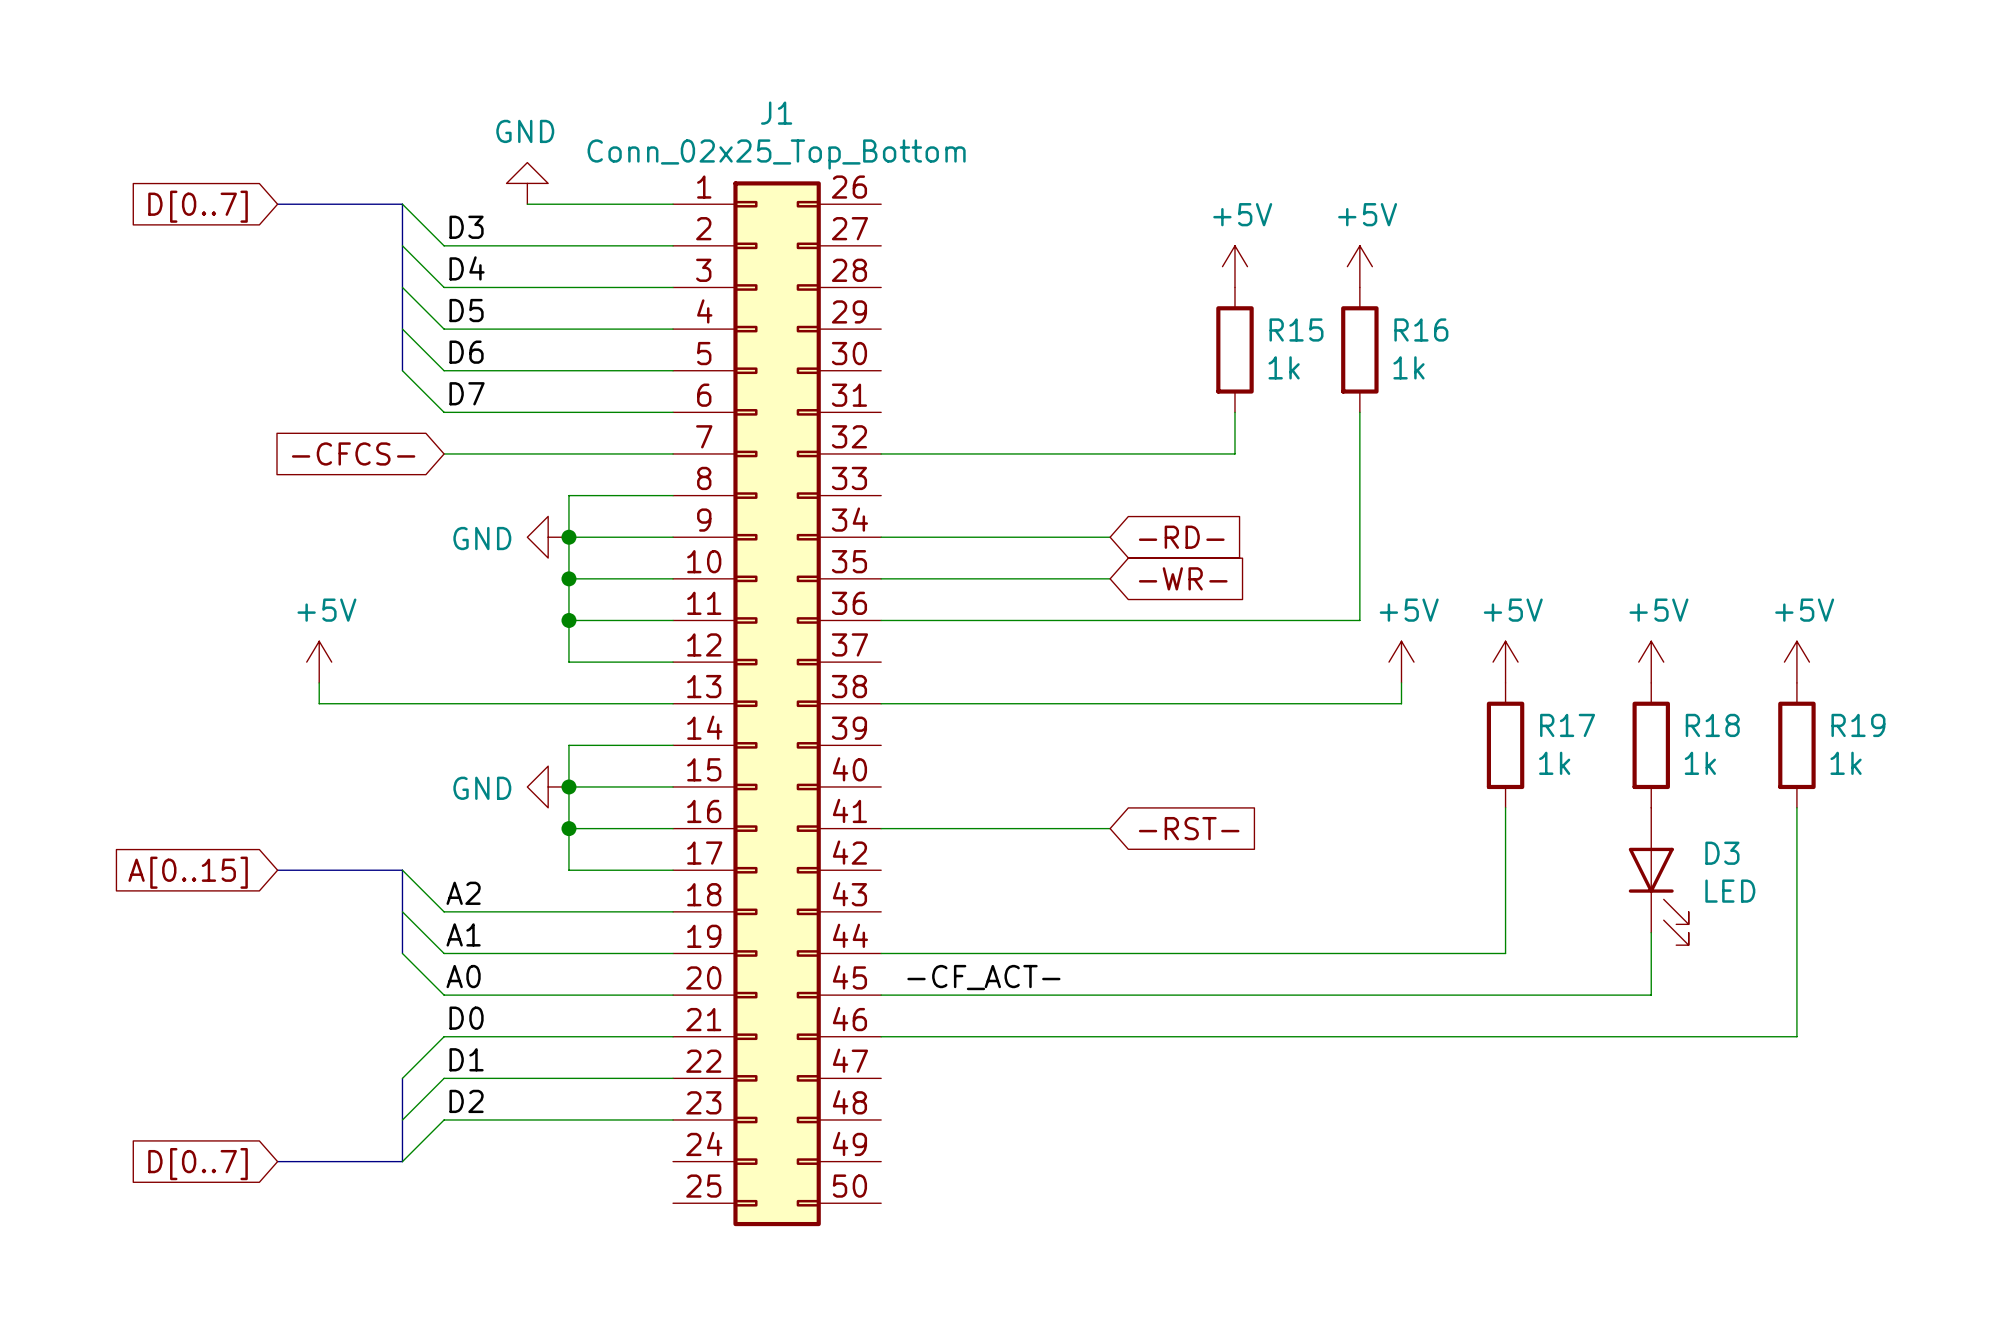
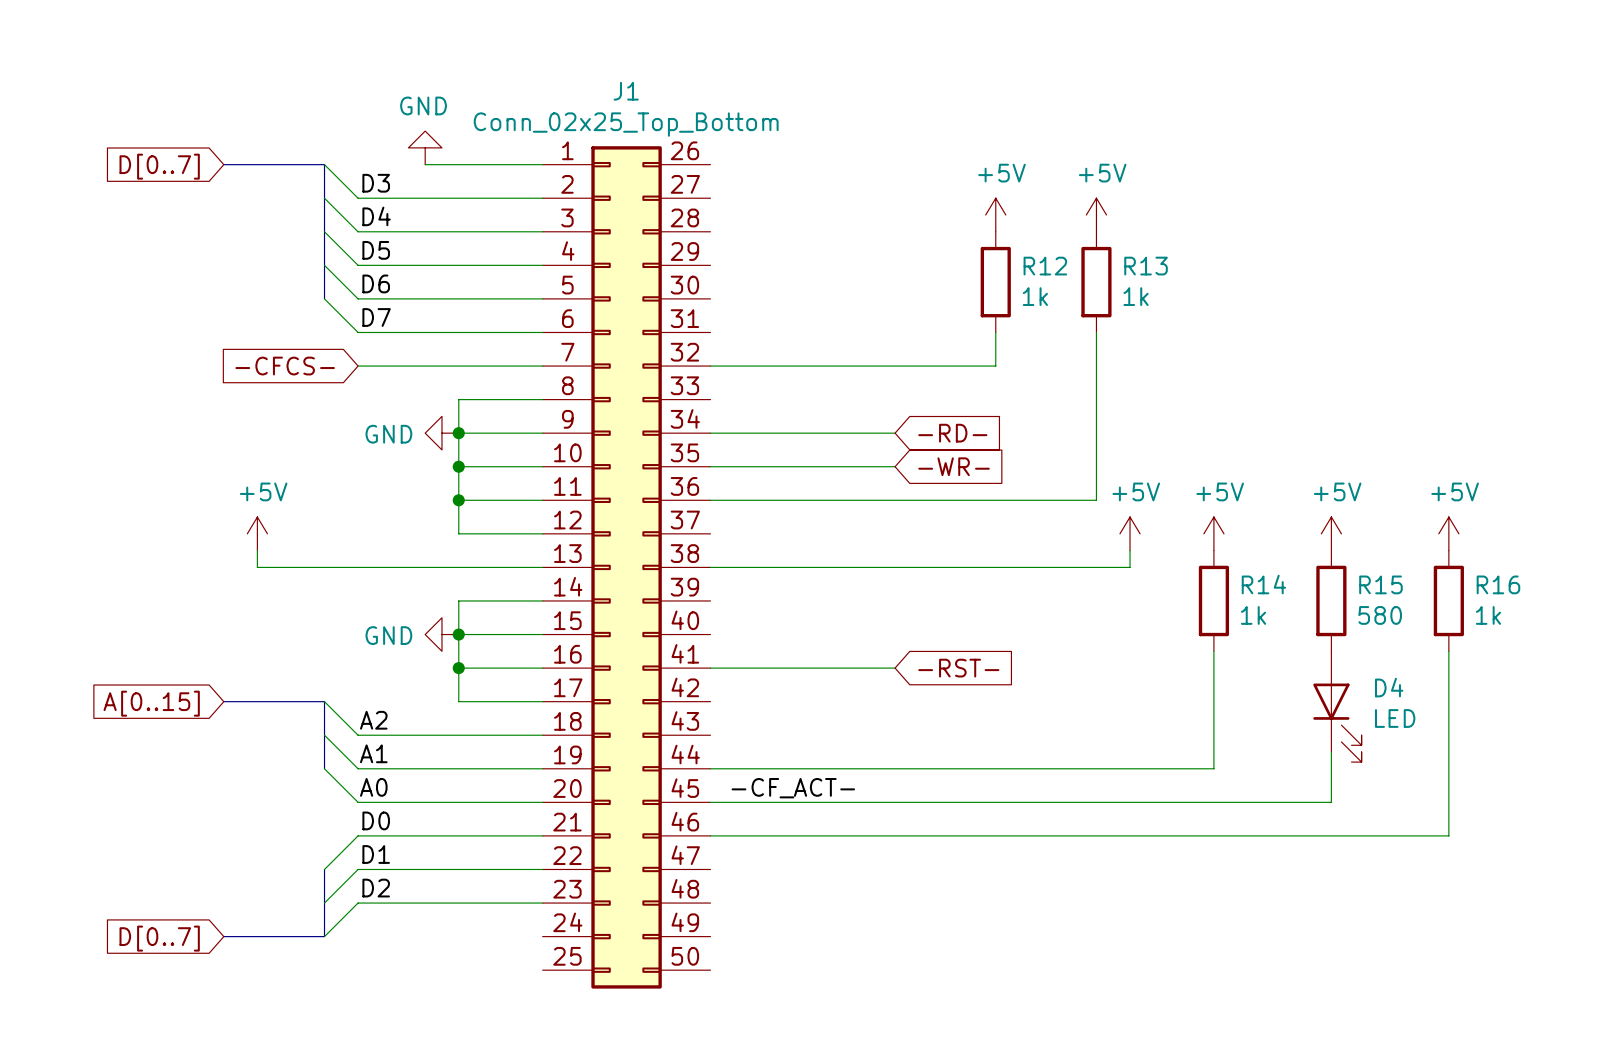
R15 name: R15 (1296, 329) -> R12 (1045, 266)
R16 name: R16 (1421, 329) -> R13 (1146, 266)
R17 name: R17 (1567, 725) -> R14 (1263, 584)
R18 name: R18 (1712, 725) -> R15 (1380, 584)
R19 name: R19 (1858, 725) -> R16 (1498, 584)
R18 value: 1k (1700, 763) -> 580 (1380, 615)
D3 name: D3 (1722, 853) -> D4 (1389, 687)

